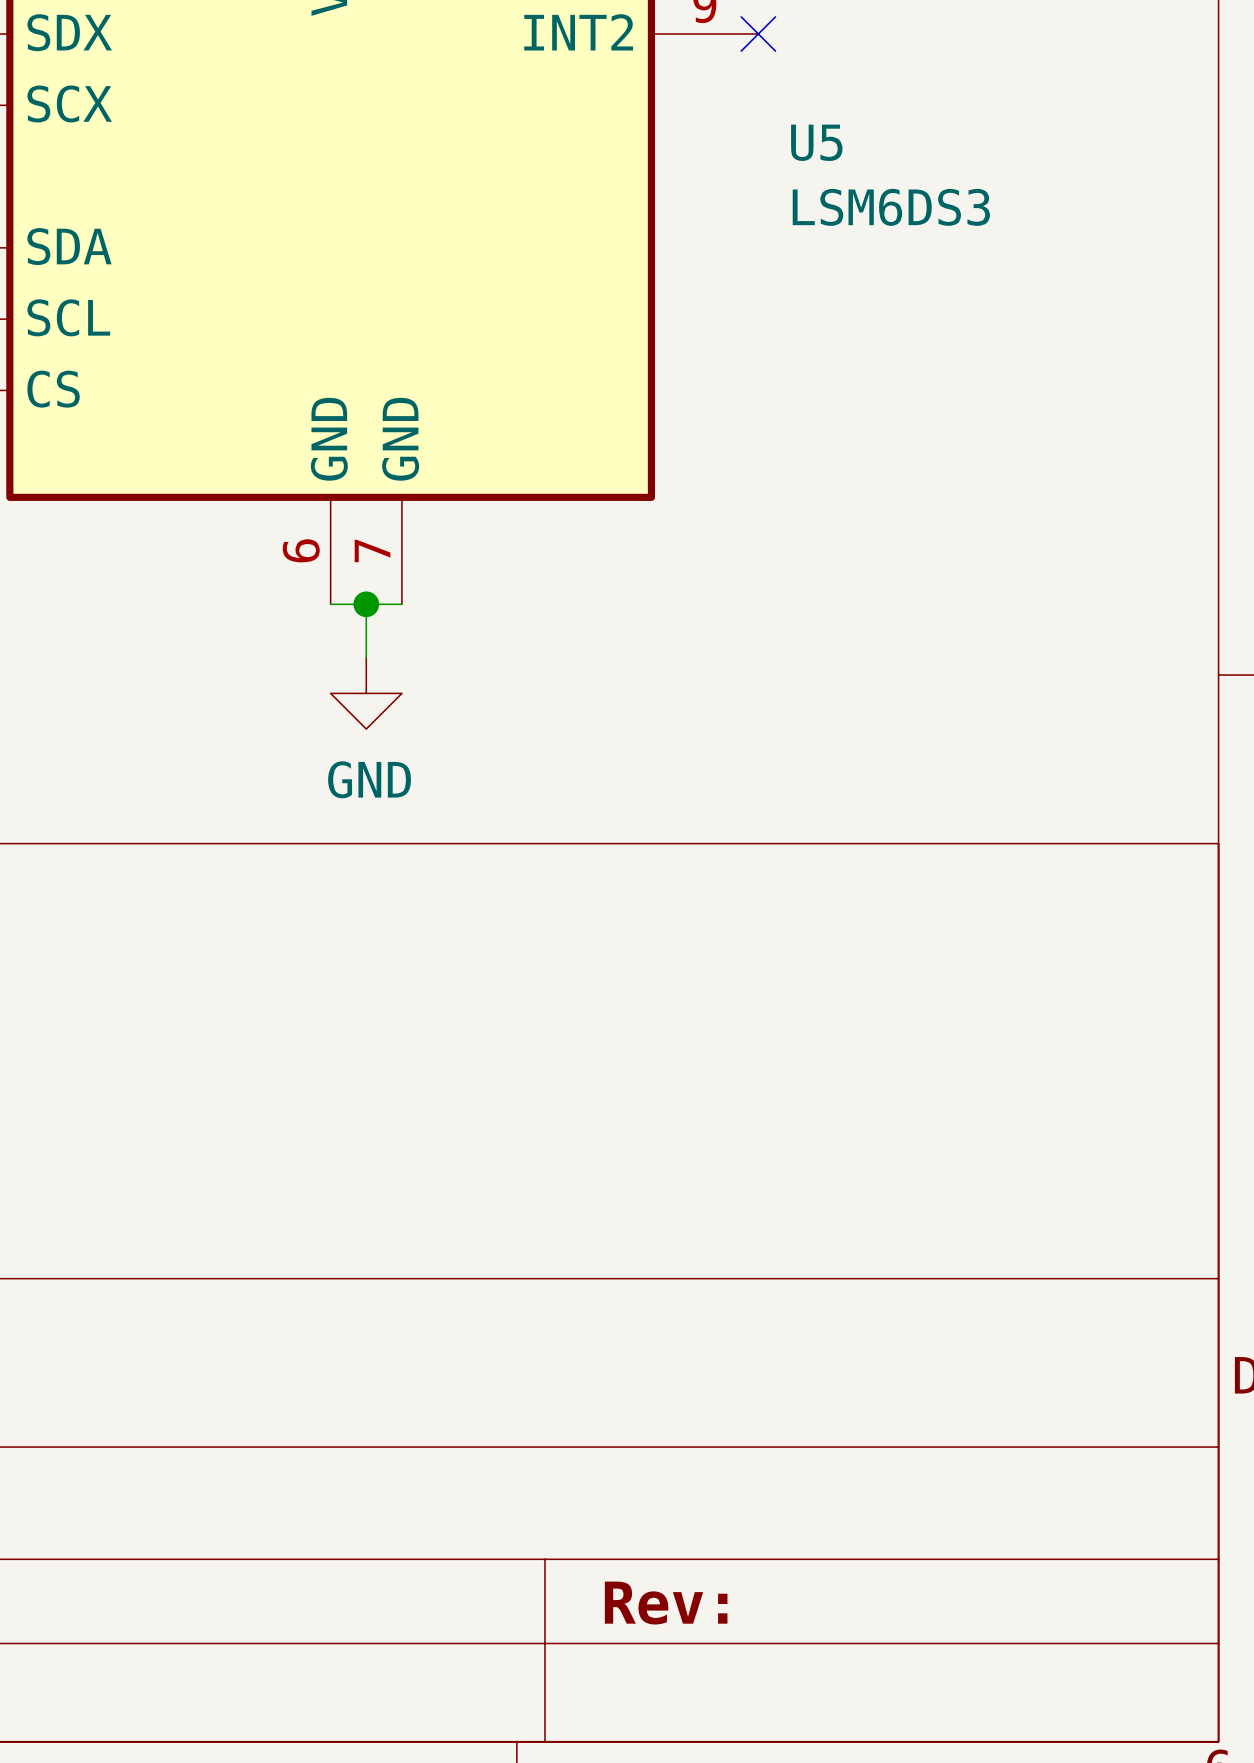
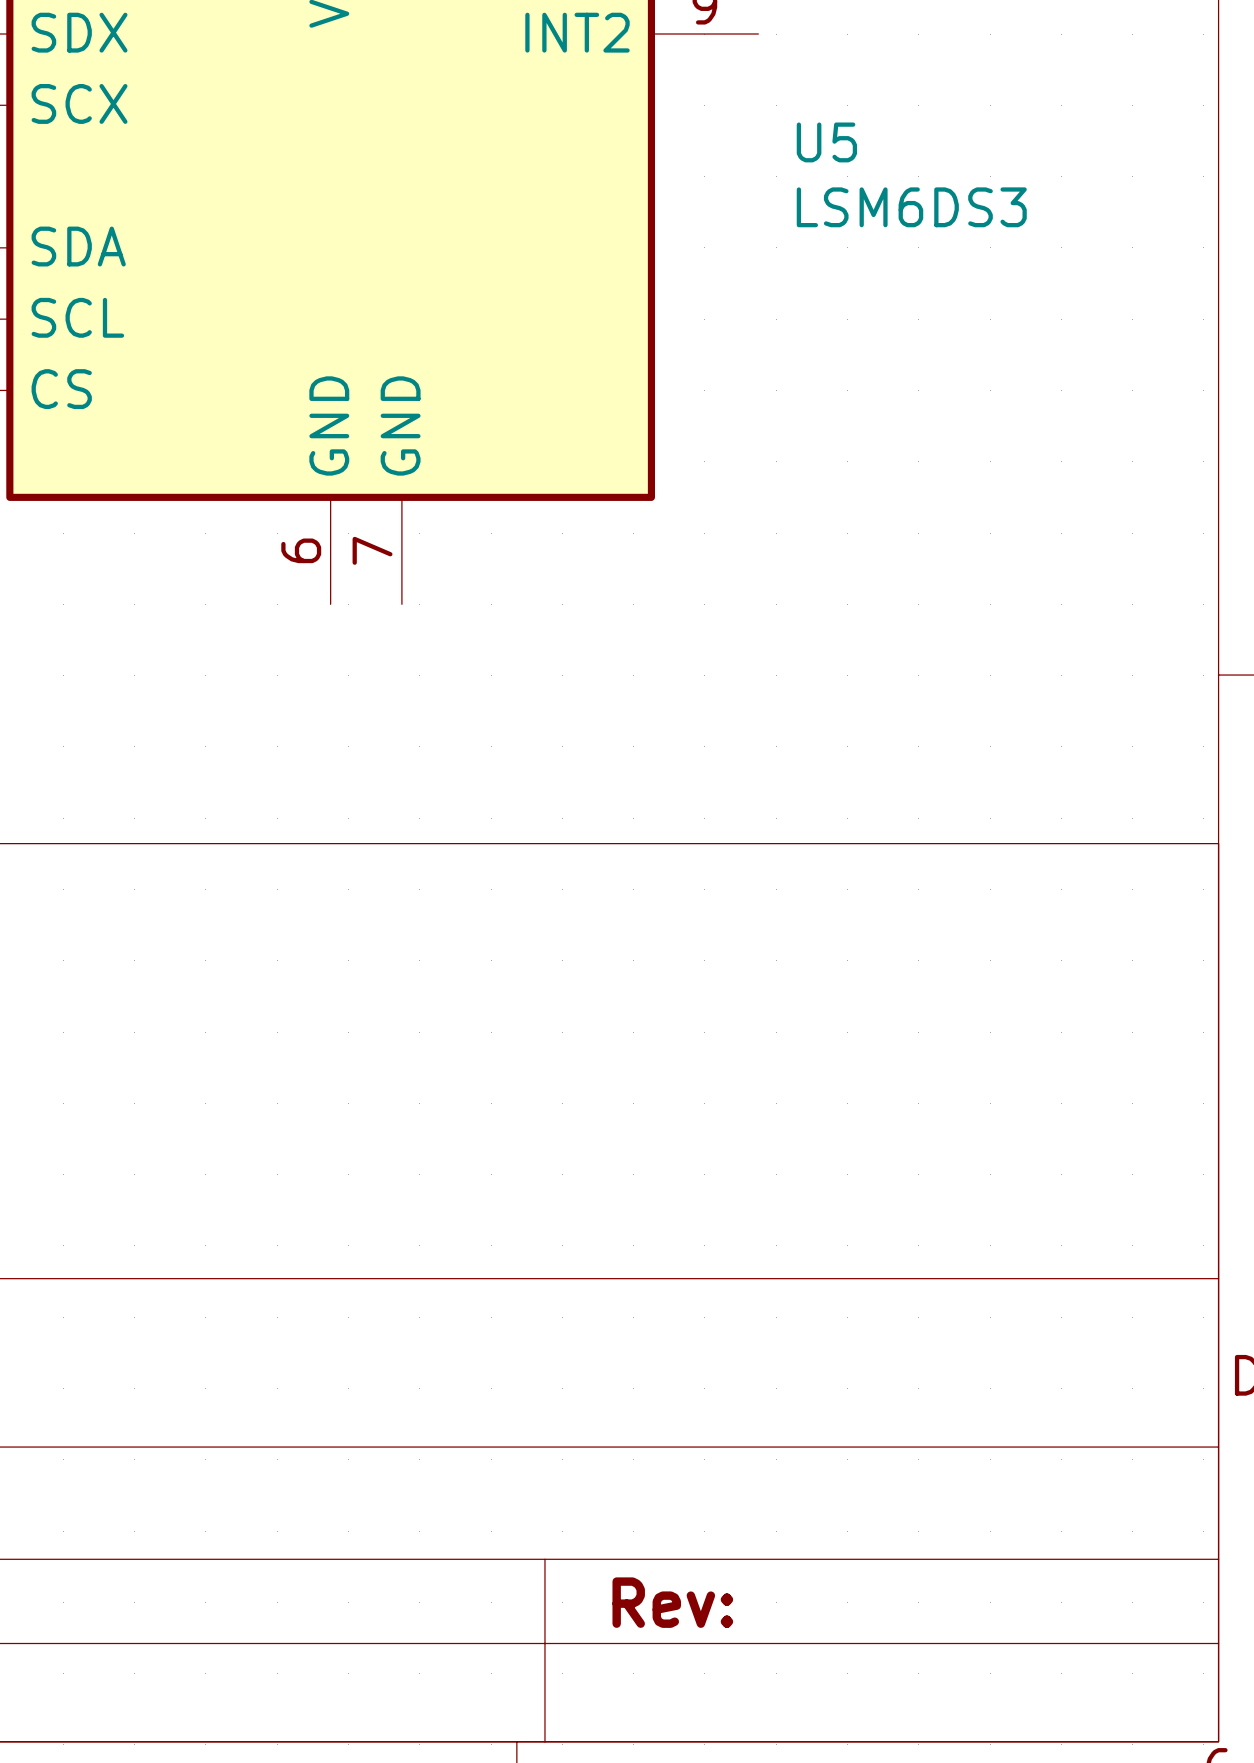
no-connect mark: (758, 34) -> none
wire: (330, 604) (401, 604) -> none
wire: (366, 604) (366, 657) -> none
junction: (366, 604) -> none
power symbol: GND (366, 693) -> none

